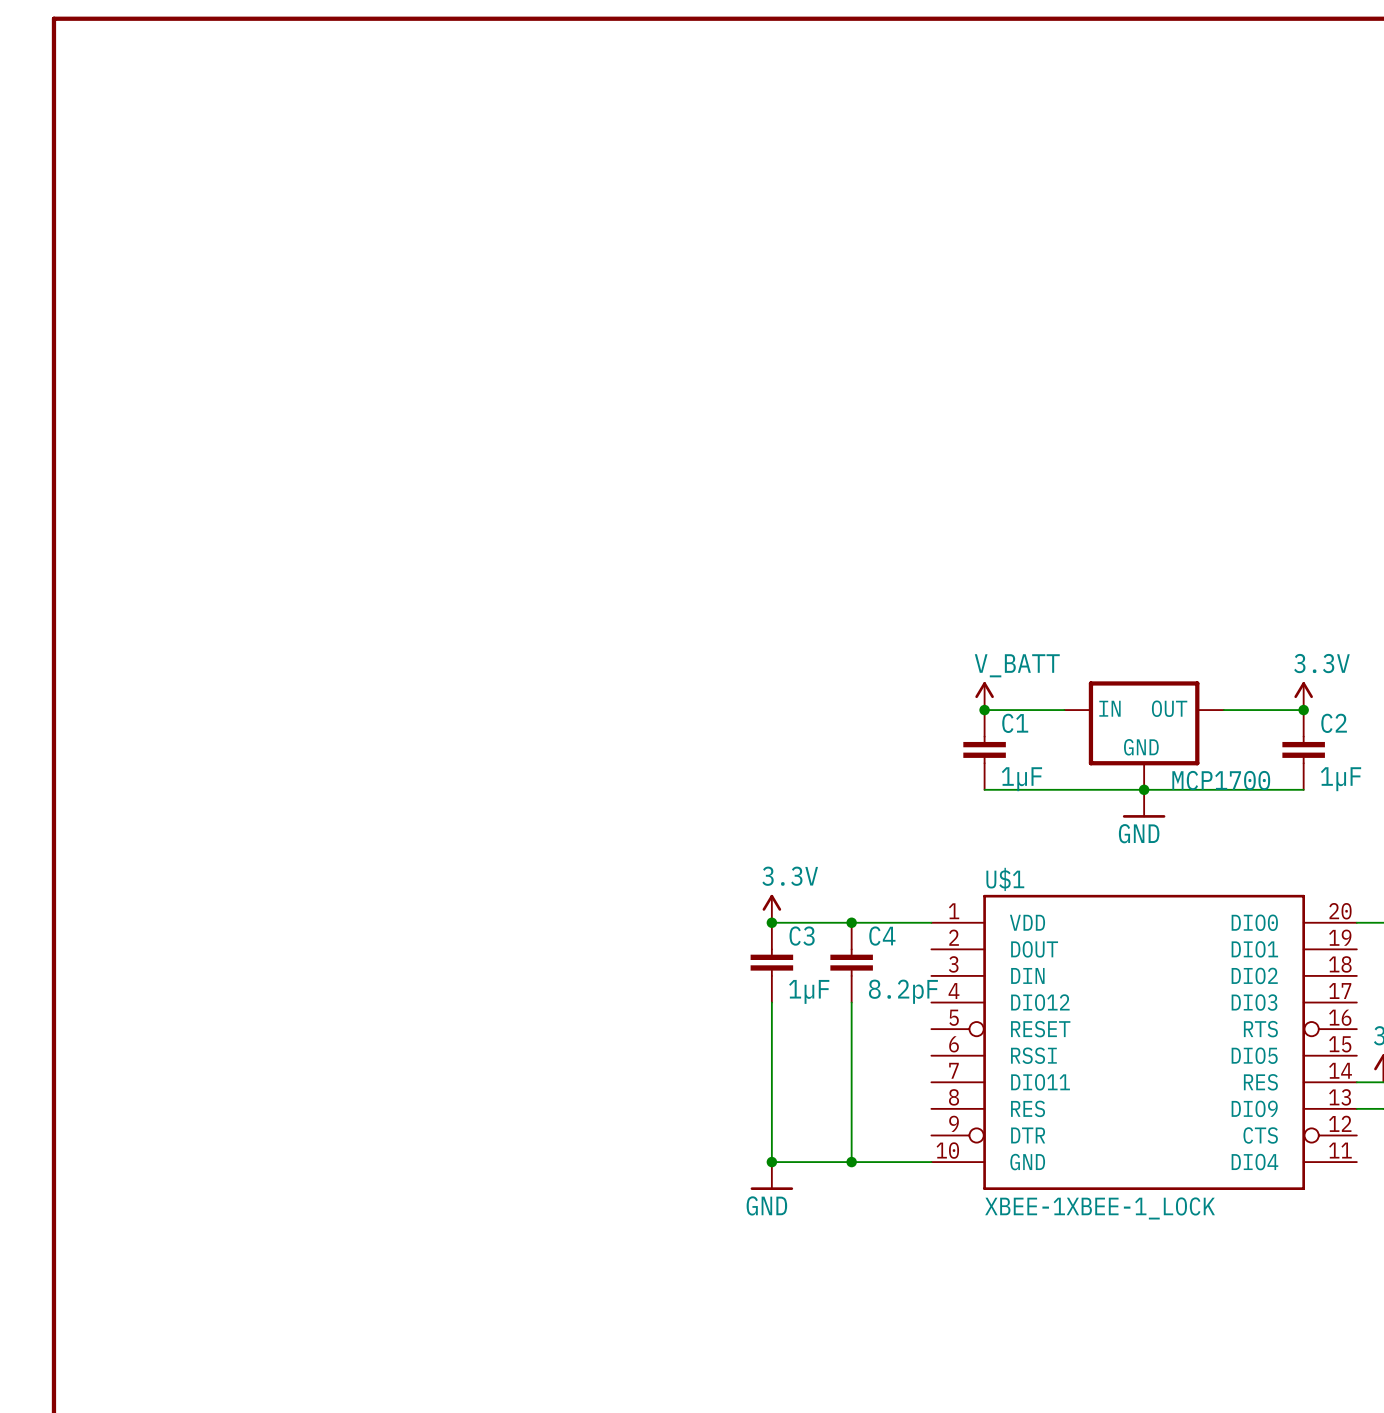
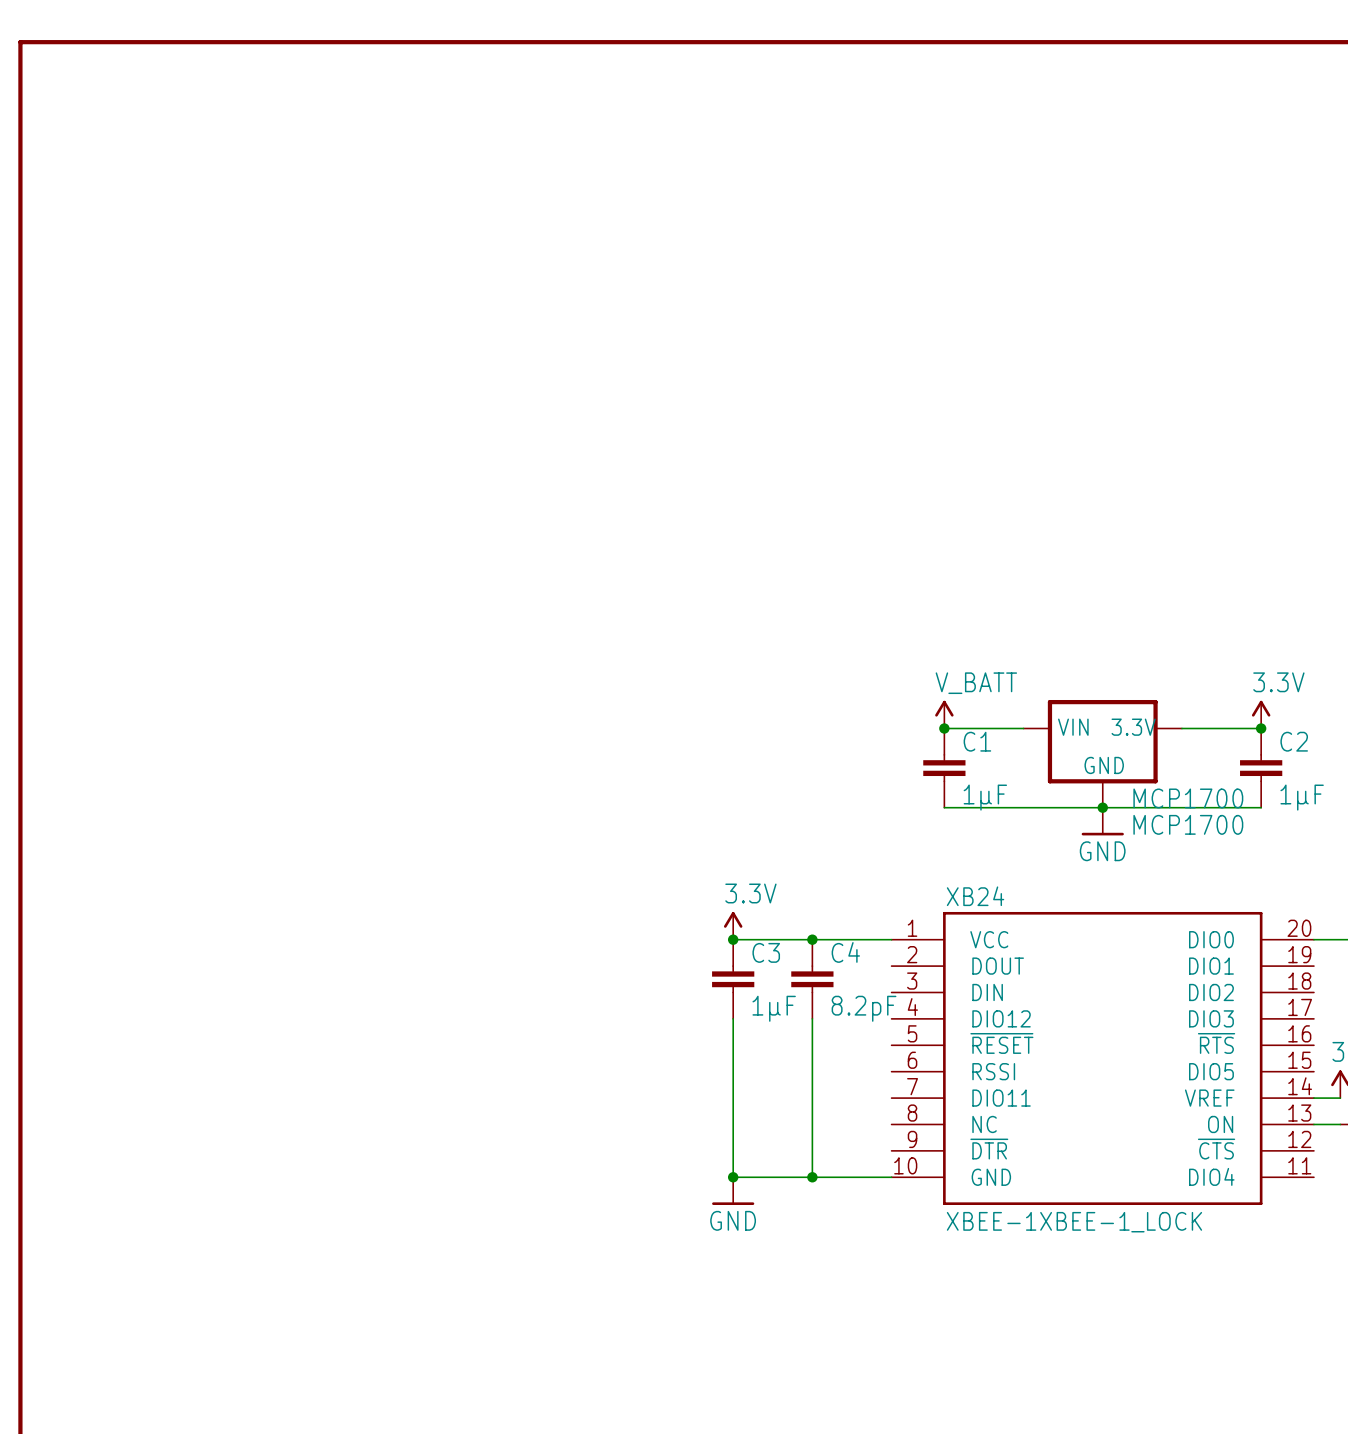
MCP1700 text: IN (1109, 708) -> VIN (1073, 727)
MCP1700 text: OUT (1169, 708) -> 3.3V (1133, 727)
MCP1700 value: none -> MCP1700 (1188, 824)
U$1: XBEE-1XBEE-1_LOCK (1144, 1042) -> none
XB24: none -> XBEE-1XBEE-1_LOCK (1102, 1058)

